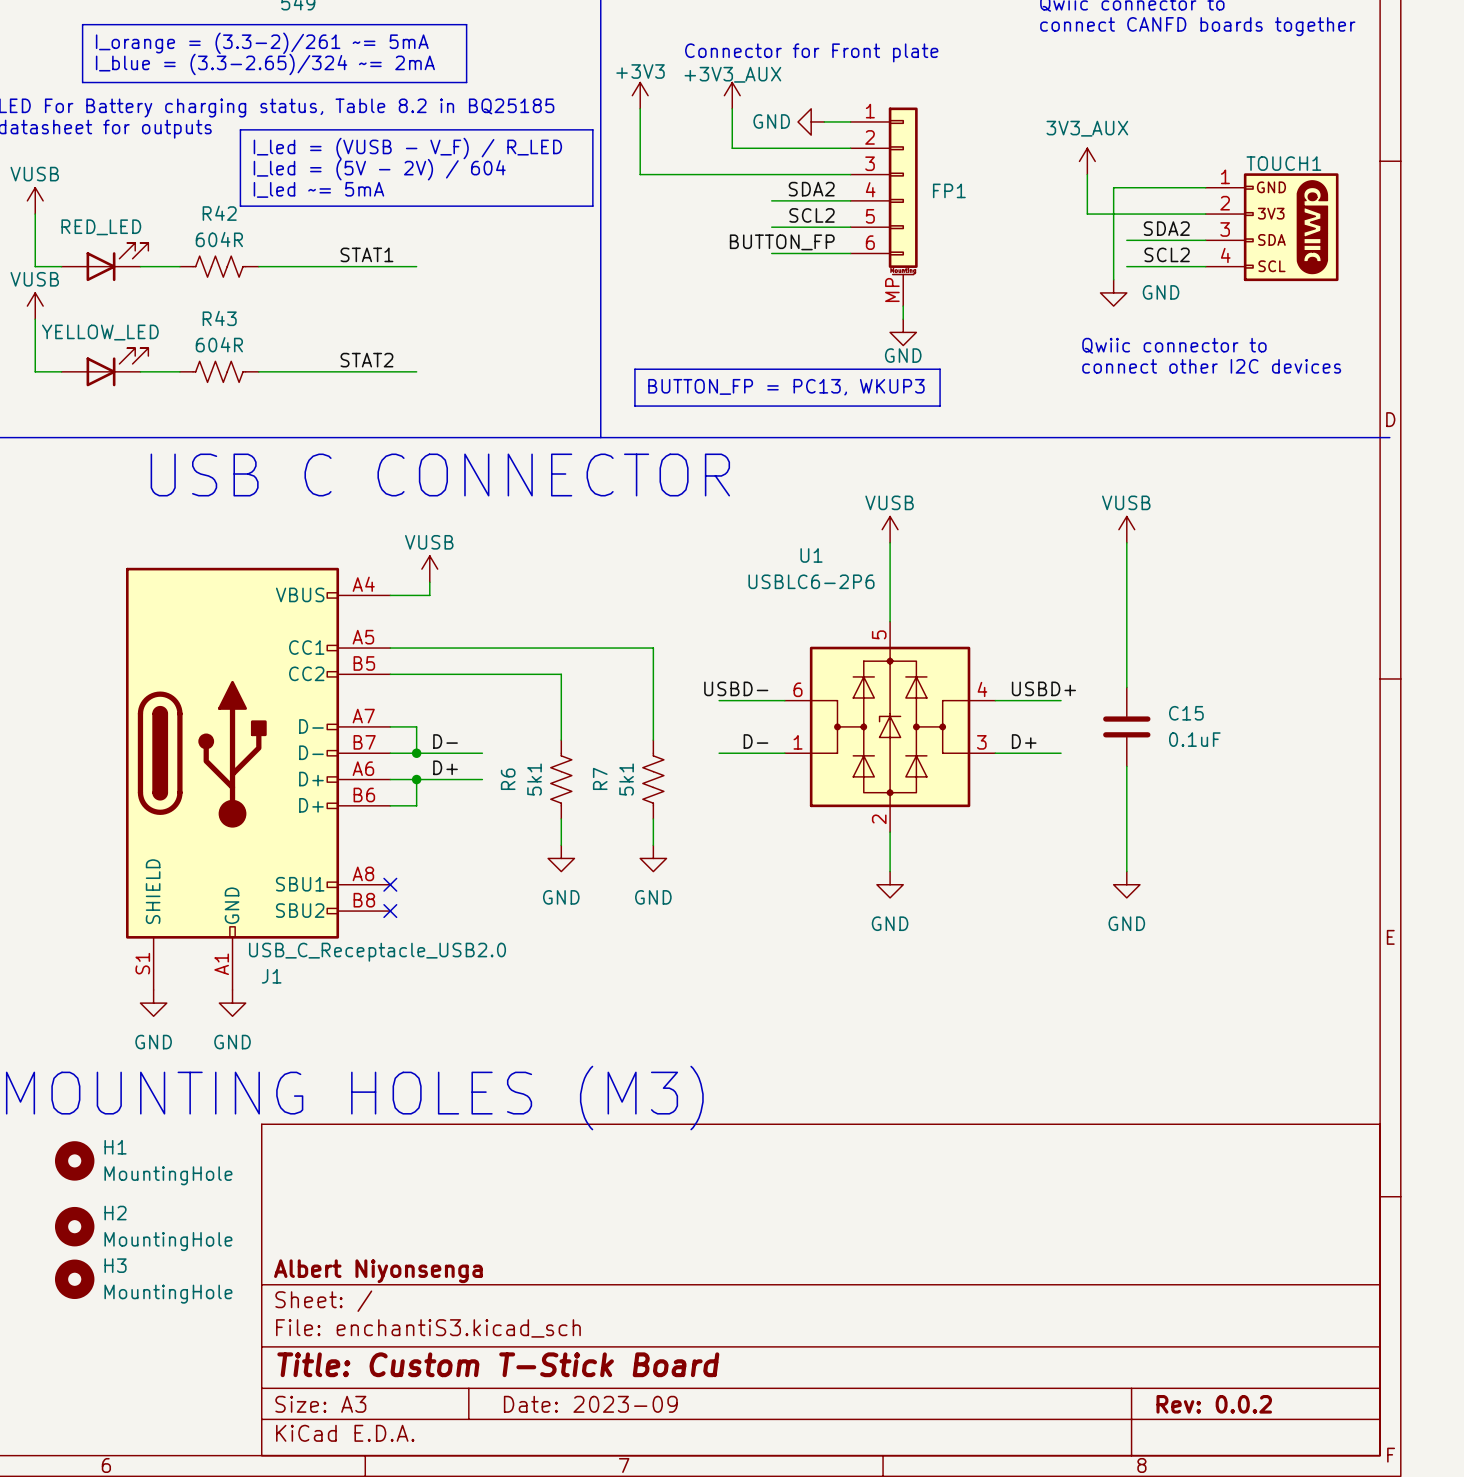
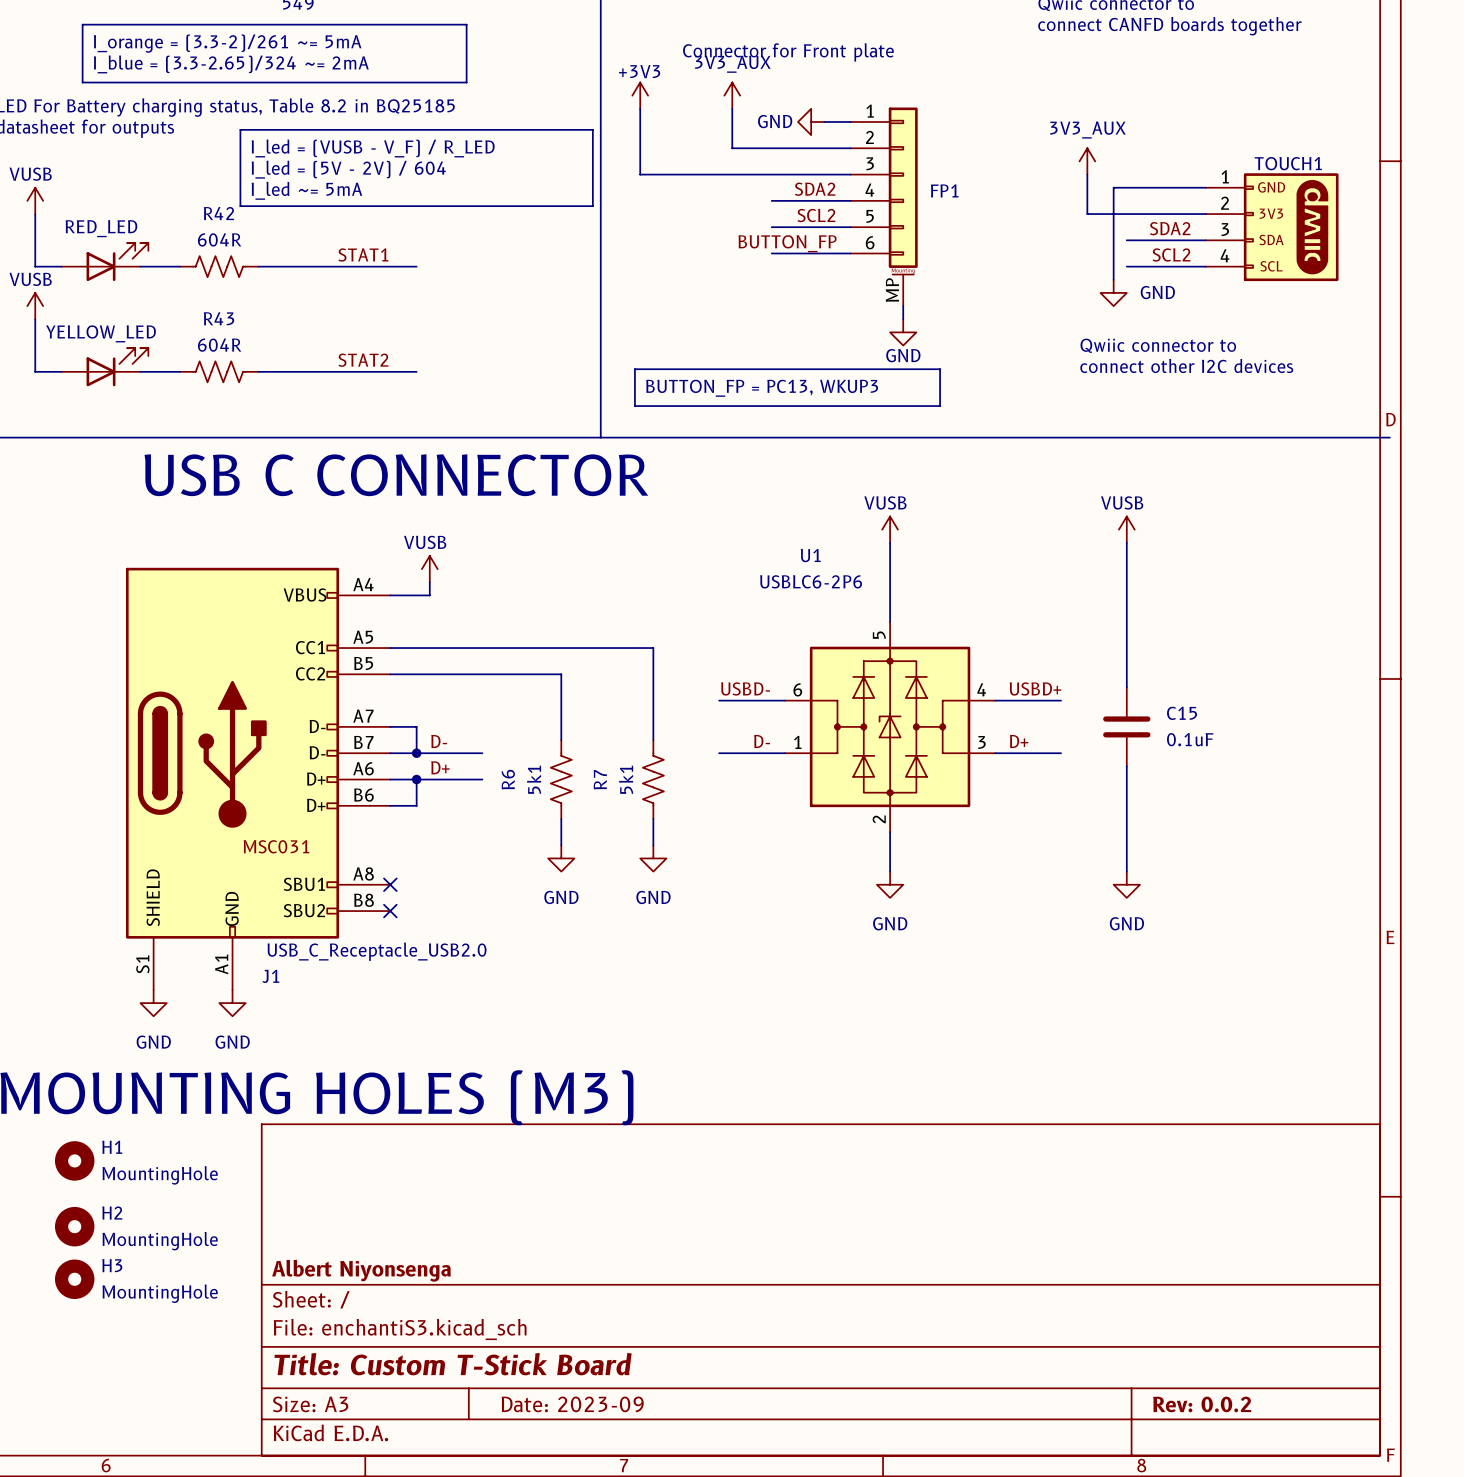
power symbol: +3V3_AUX (732, 95) -> 3V3_AUX (732, 95)
label: none -> MSC031 (276, 846)

